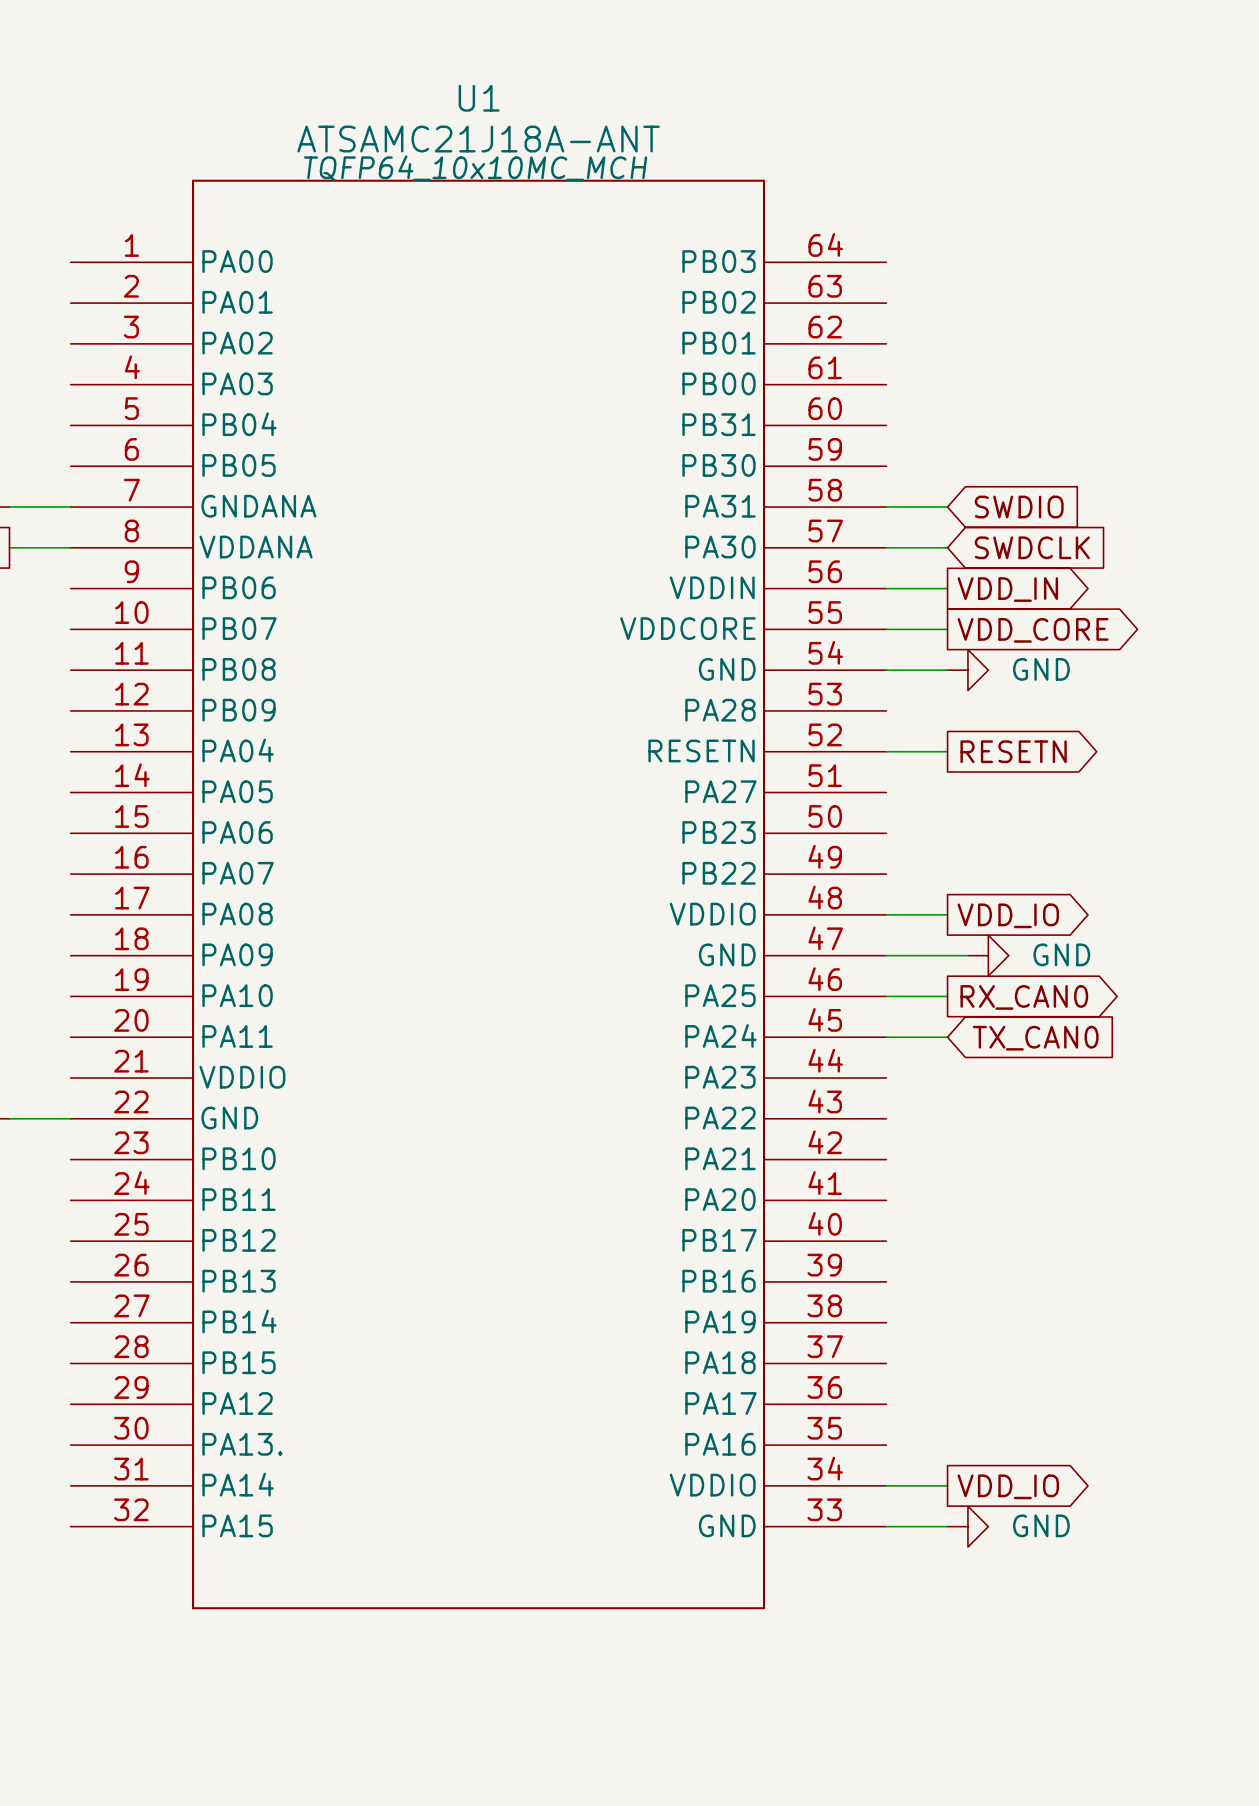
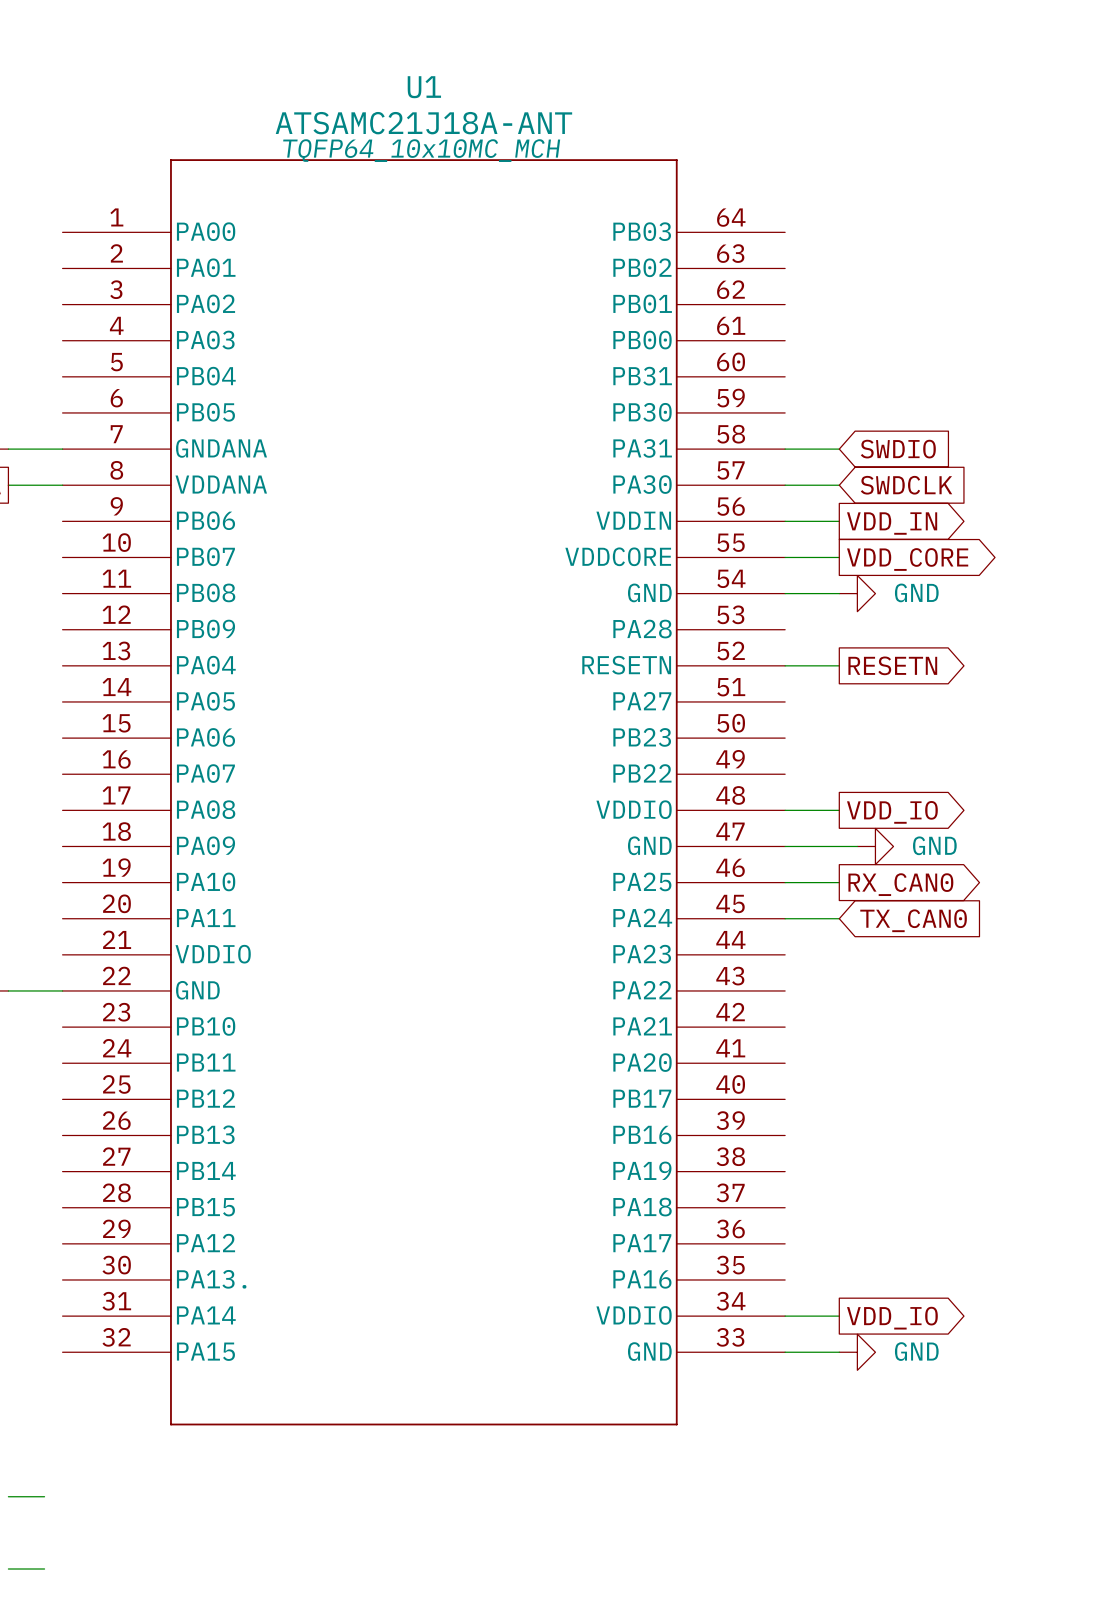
wire: none -> (8, 1496) (44, 1496)
wire: none -> (8, 1569) (44, 1569)

